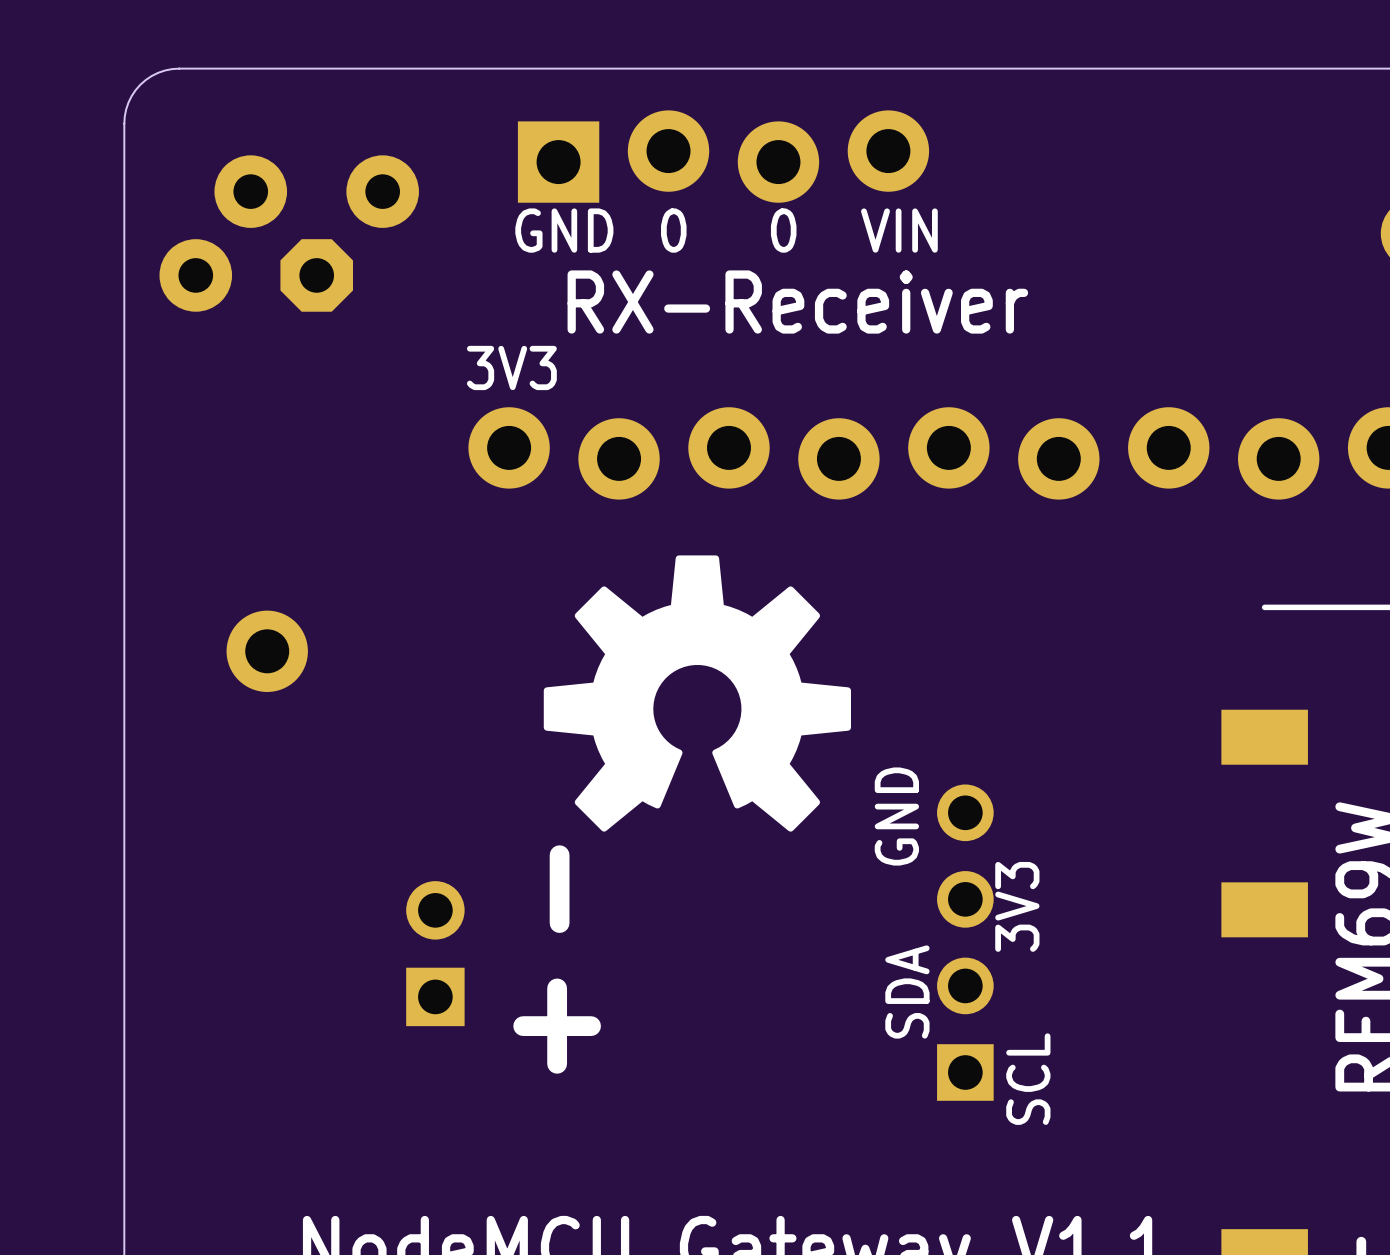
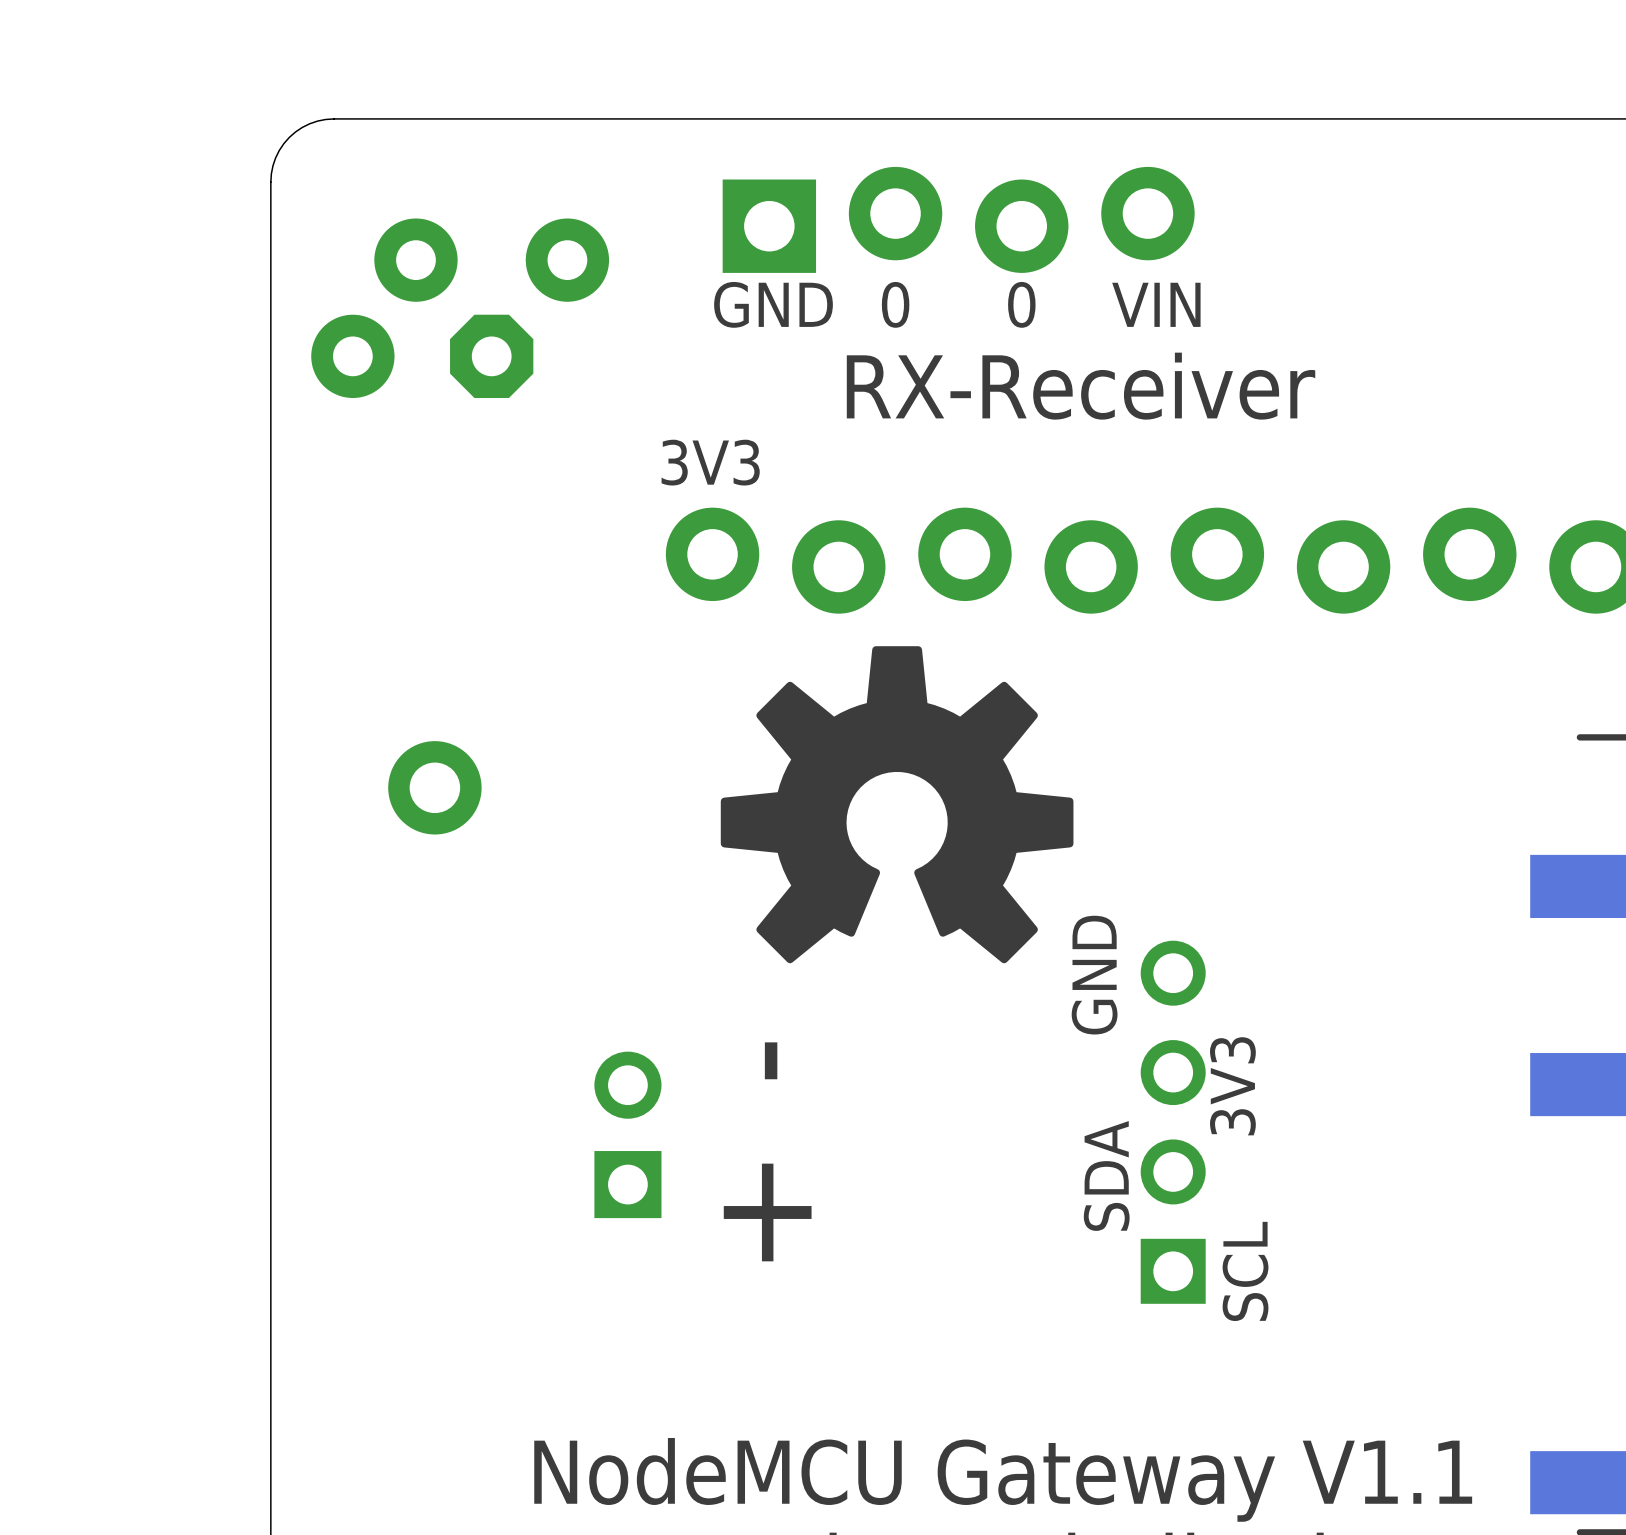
drawing position: (697, 693) -> (897, 804)
text position: GND (896, 816) -> GND (1094, 975)
text position: 3V3 (1017, 906) -> 3V3 (1232, 1086)
part position: (965, 942) -> (1173, 1122)
text position: SDA (907, 991) -> SDA (1106, 1175)
text position: SCL (1028, 1079) -> SCL (1245, 1271)

